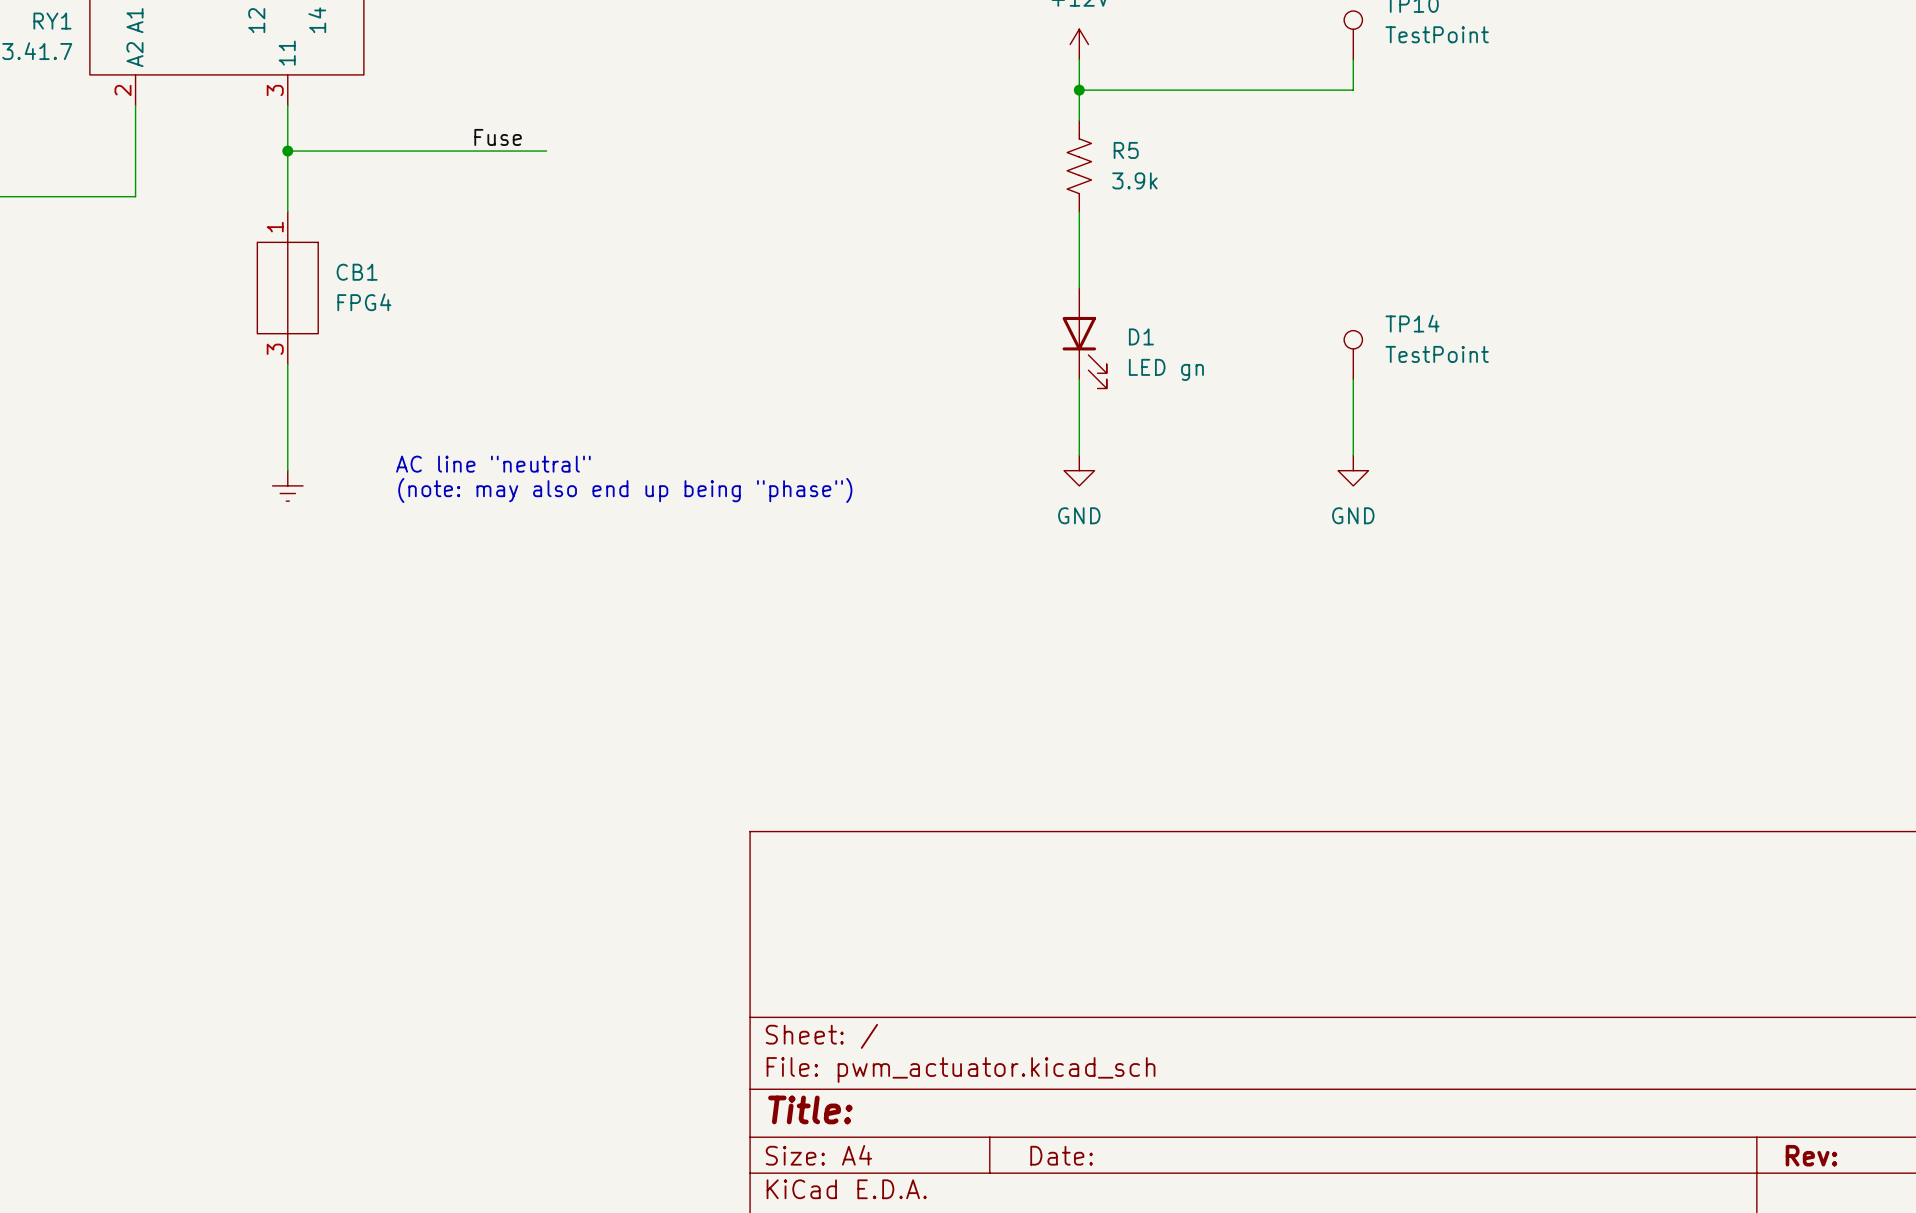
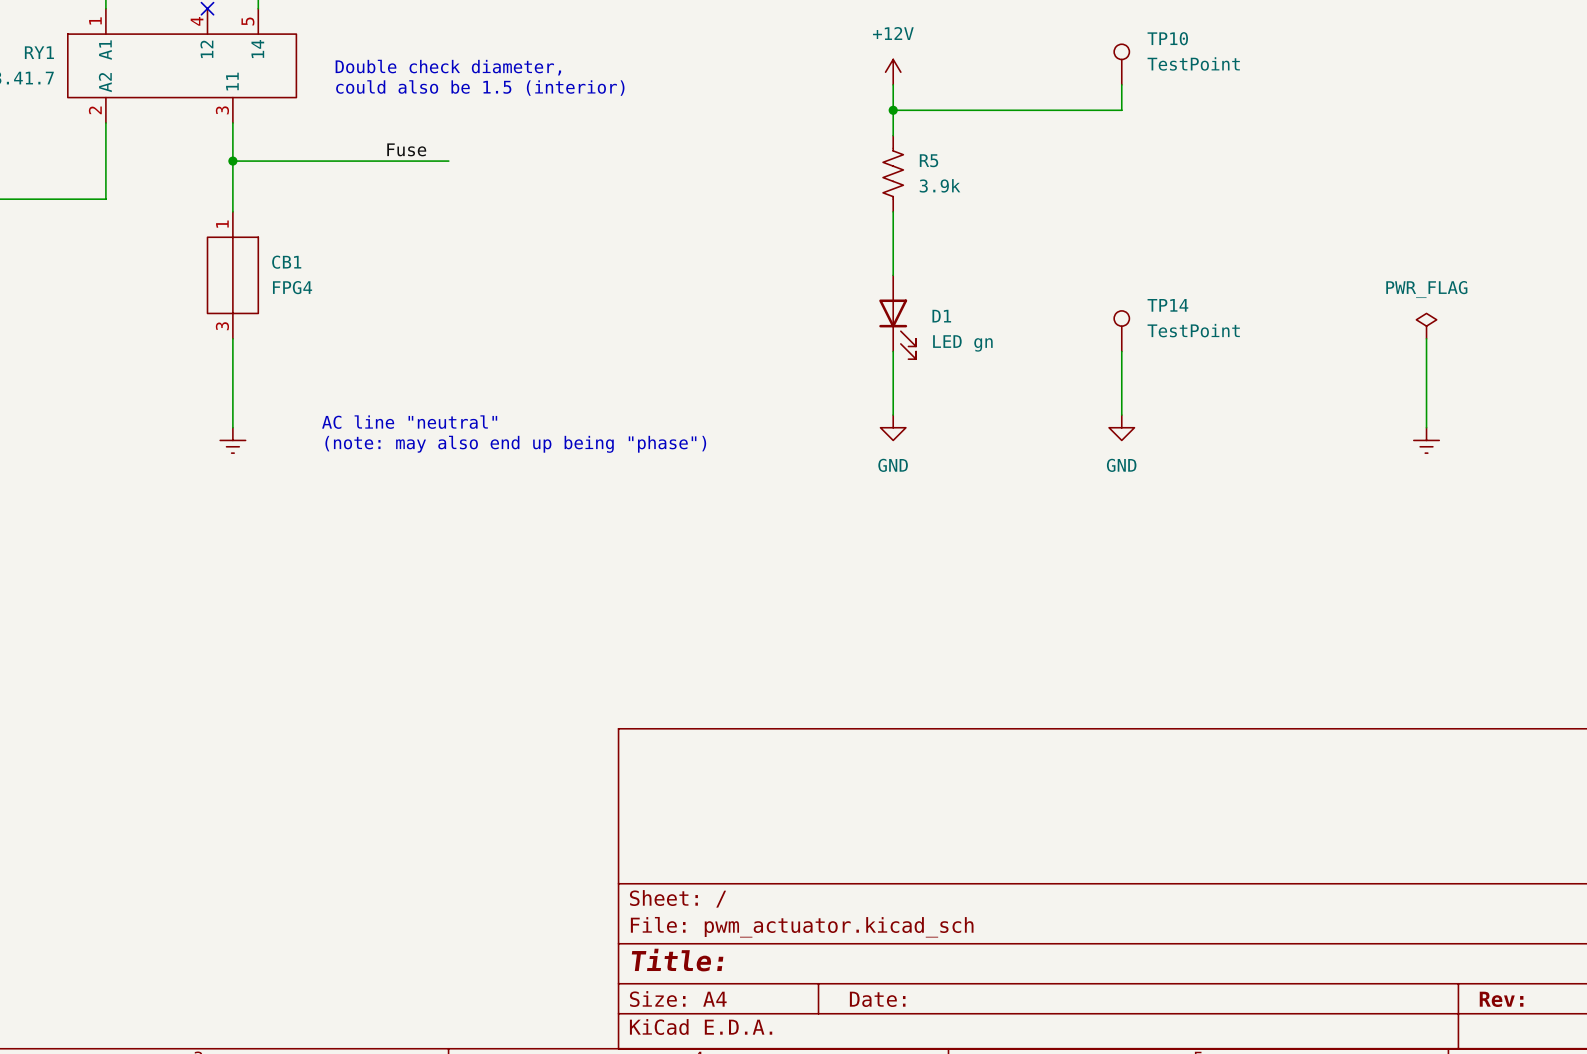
text: none -> Double check diameter, (448, 67)
text: none -> could also be 1.5 (interior) (480, 88)
power symbol: none -> PWR_FLAG (1426, 326)
wire: none -> (1426, 338) (1426, 427)
power symbol: none -> (1426, 440)

